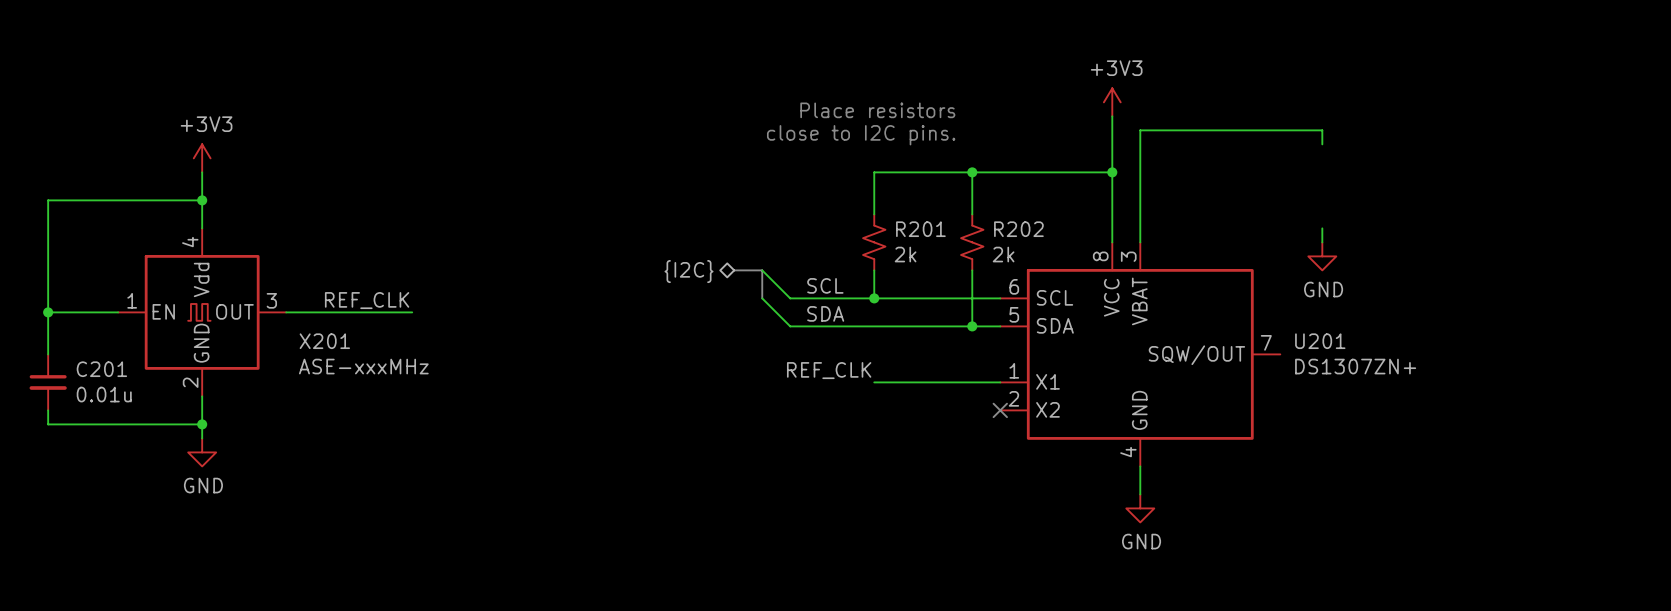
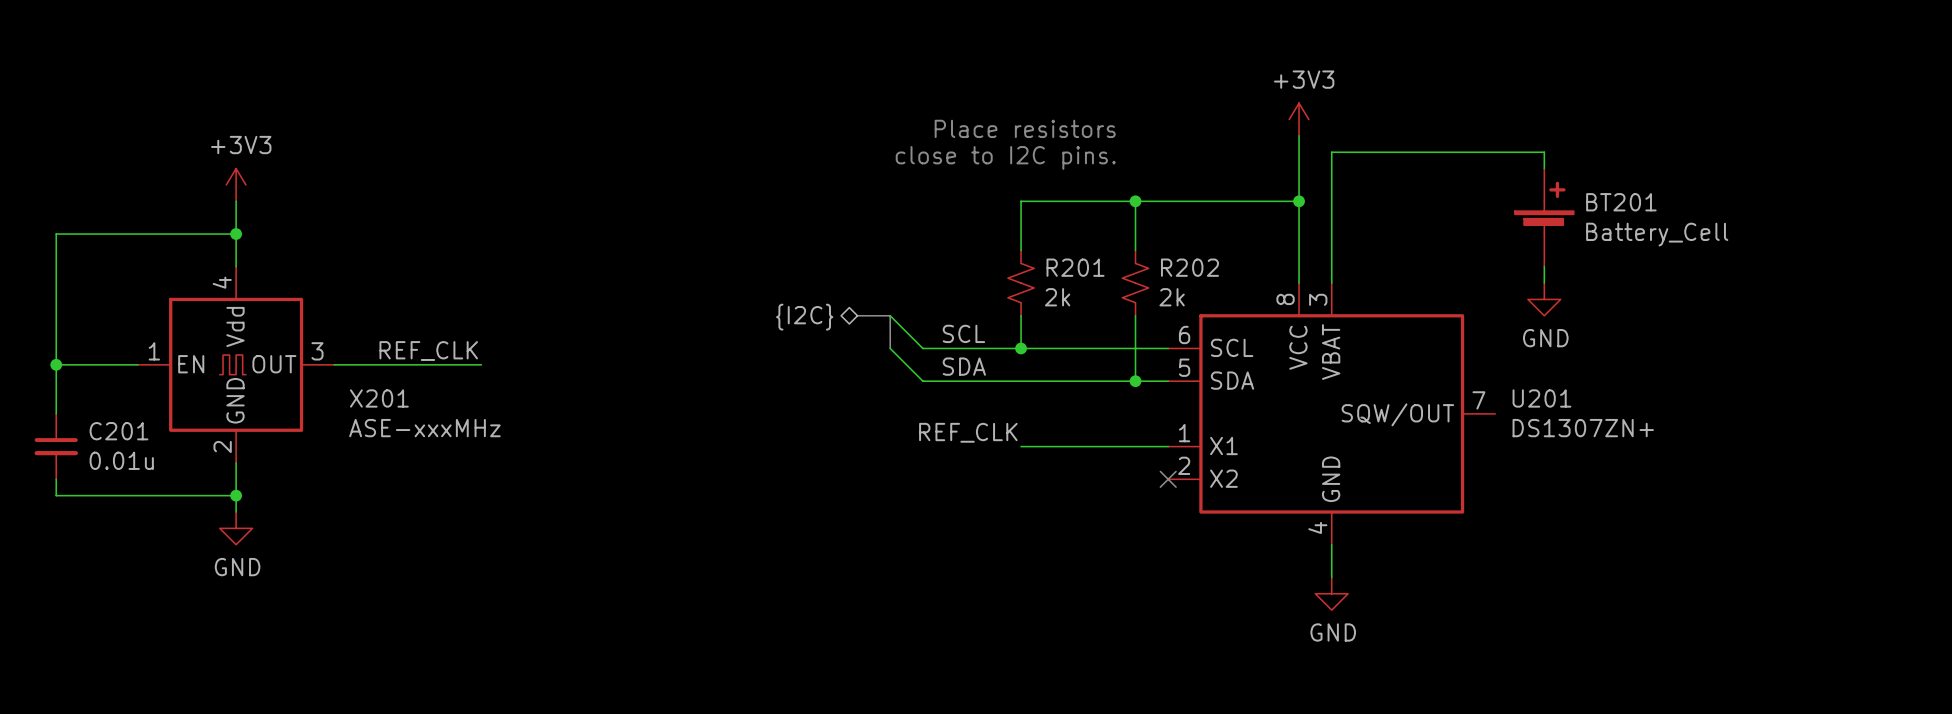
BT201: none -> Battery_Cell (1544, 217)

